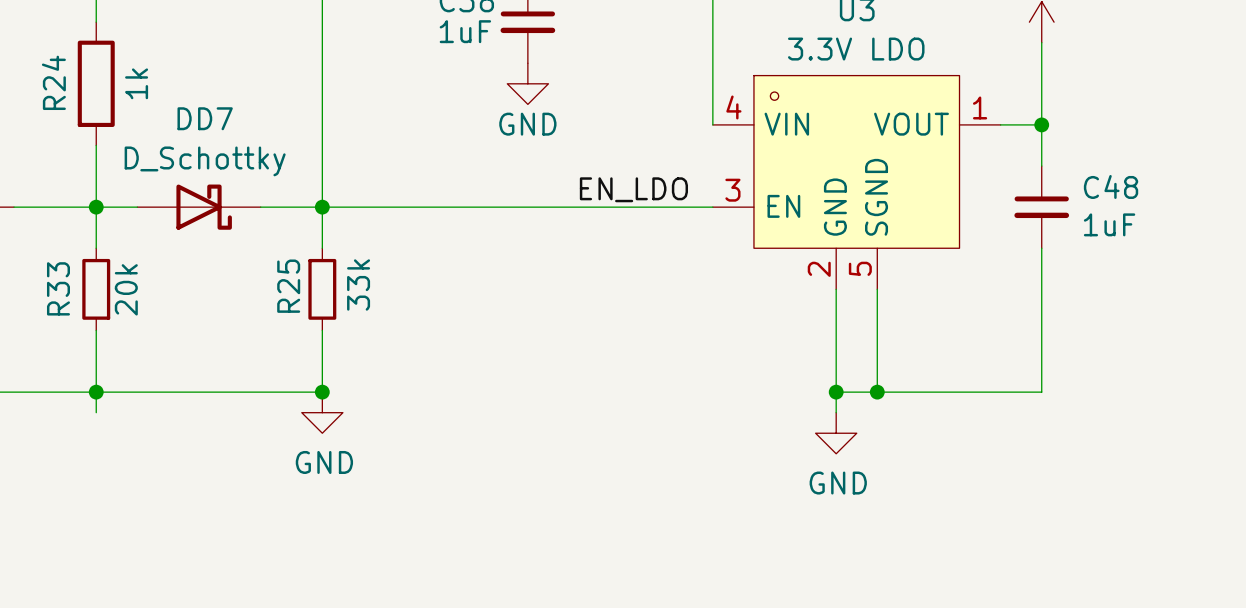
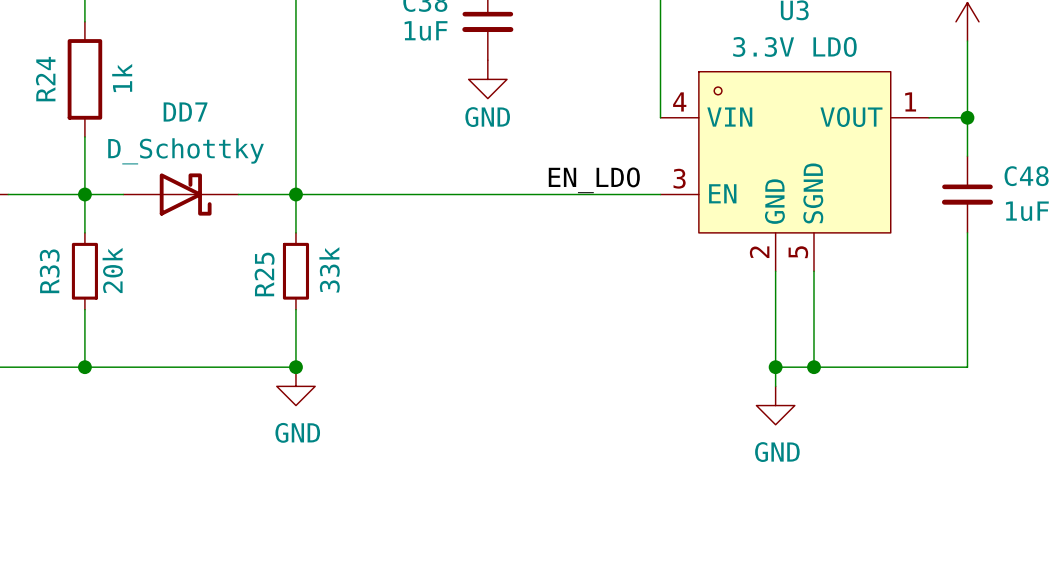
wire: (96, 392) (96, 412) -> none

